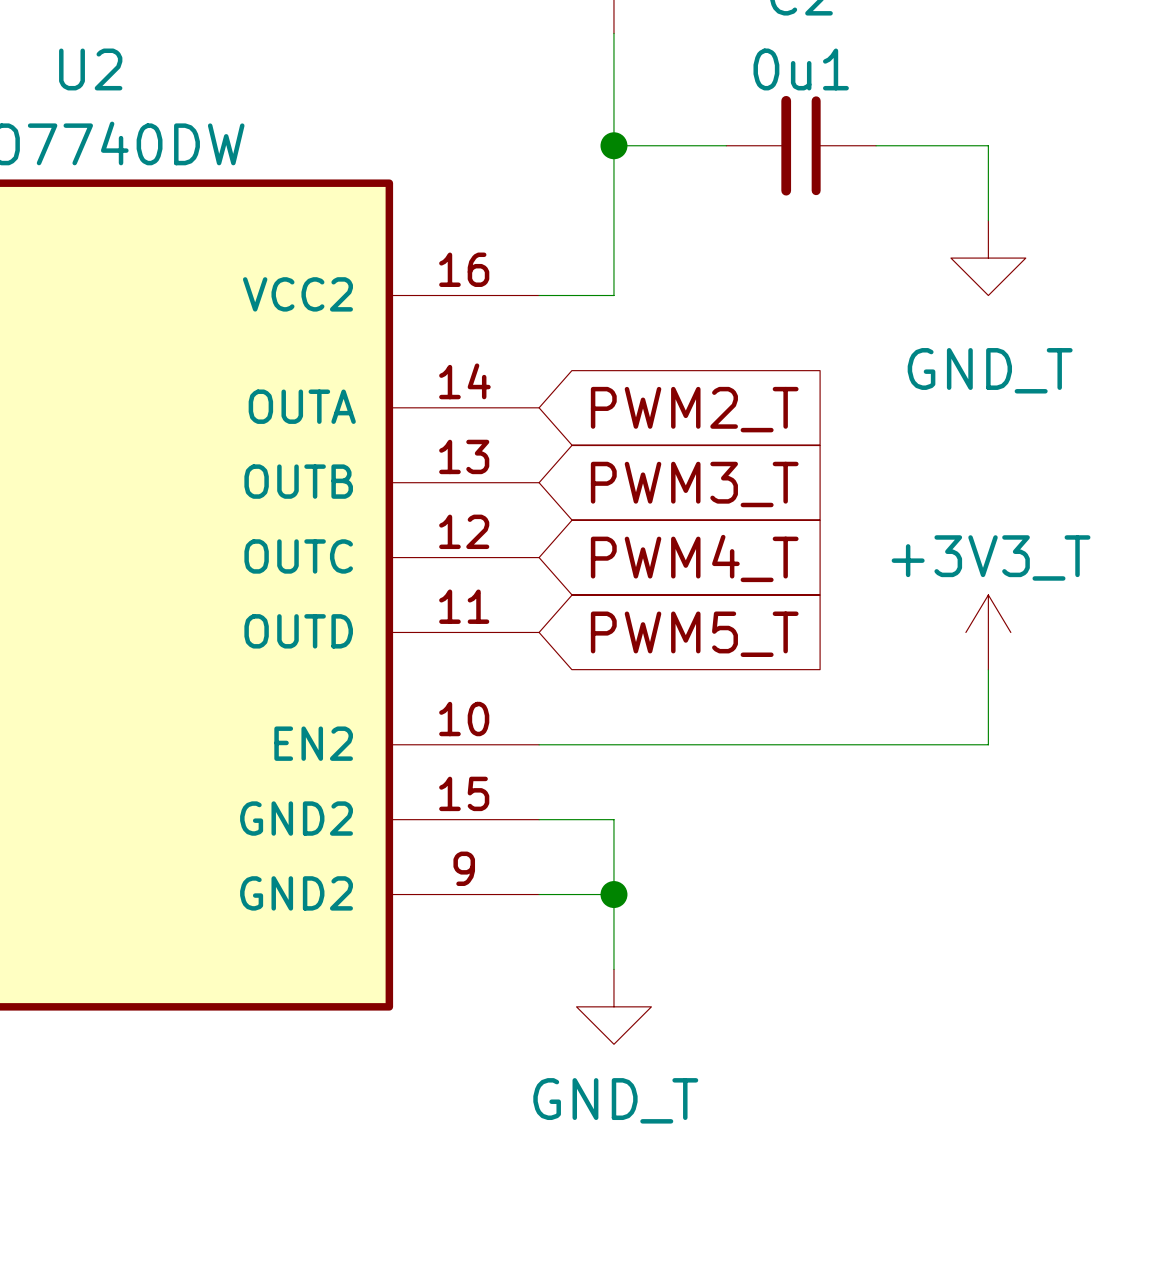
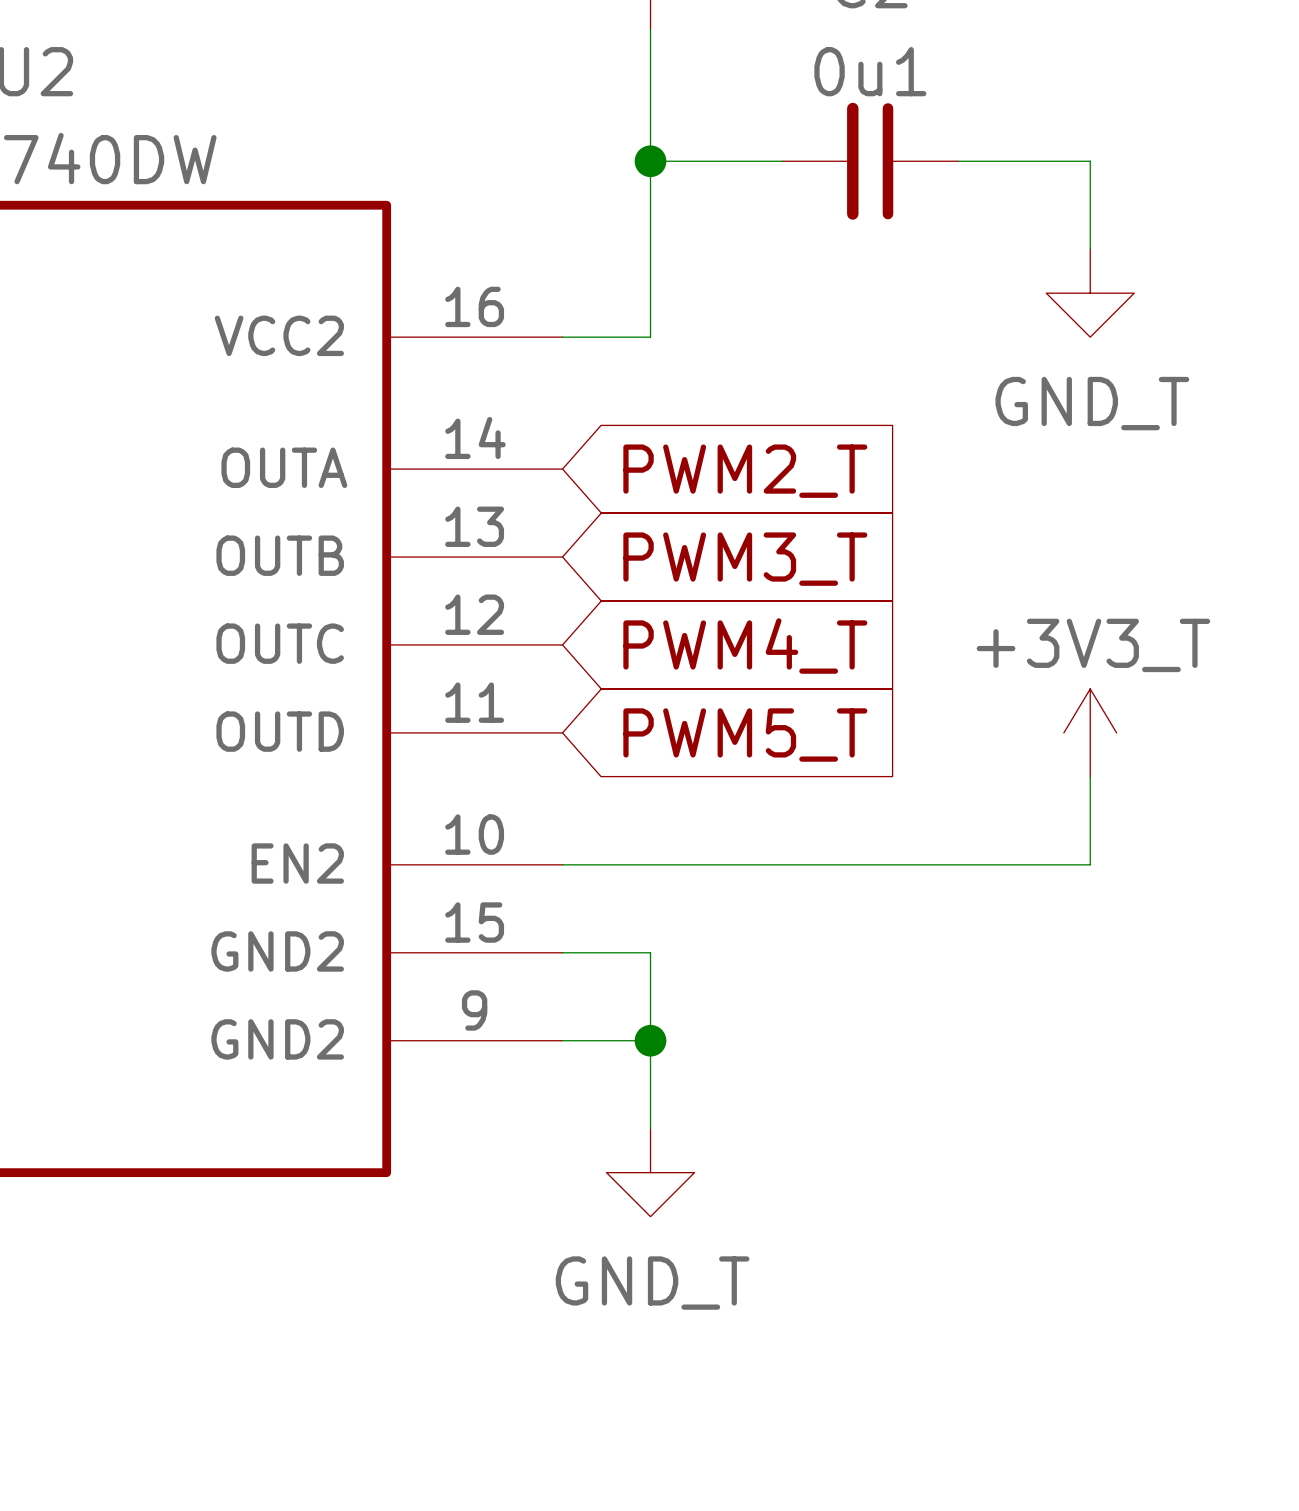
power symbol text position: GND_T (990, 370) -> GND_T (1092, 403)

